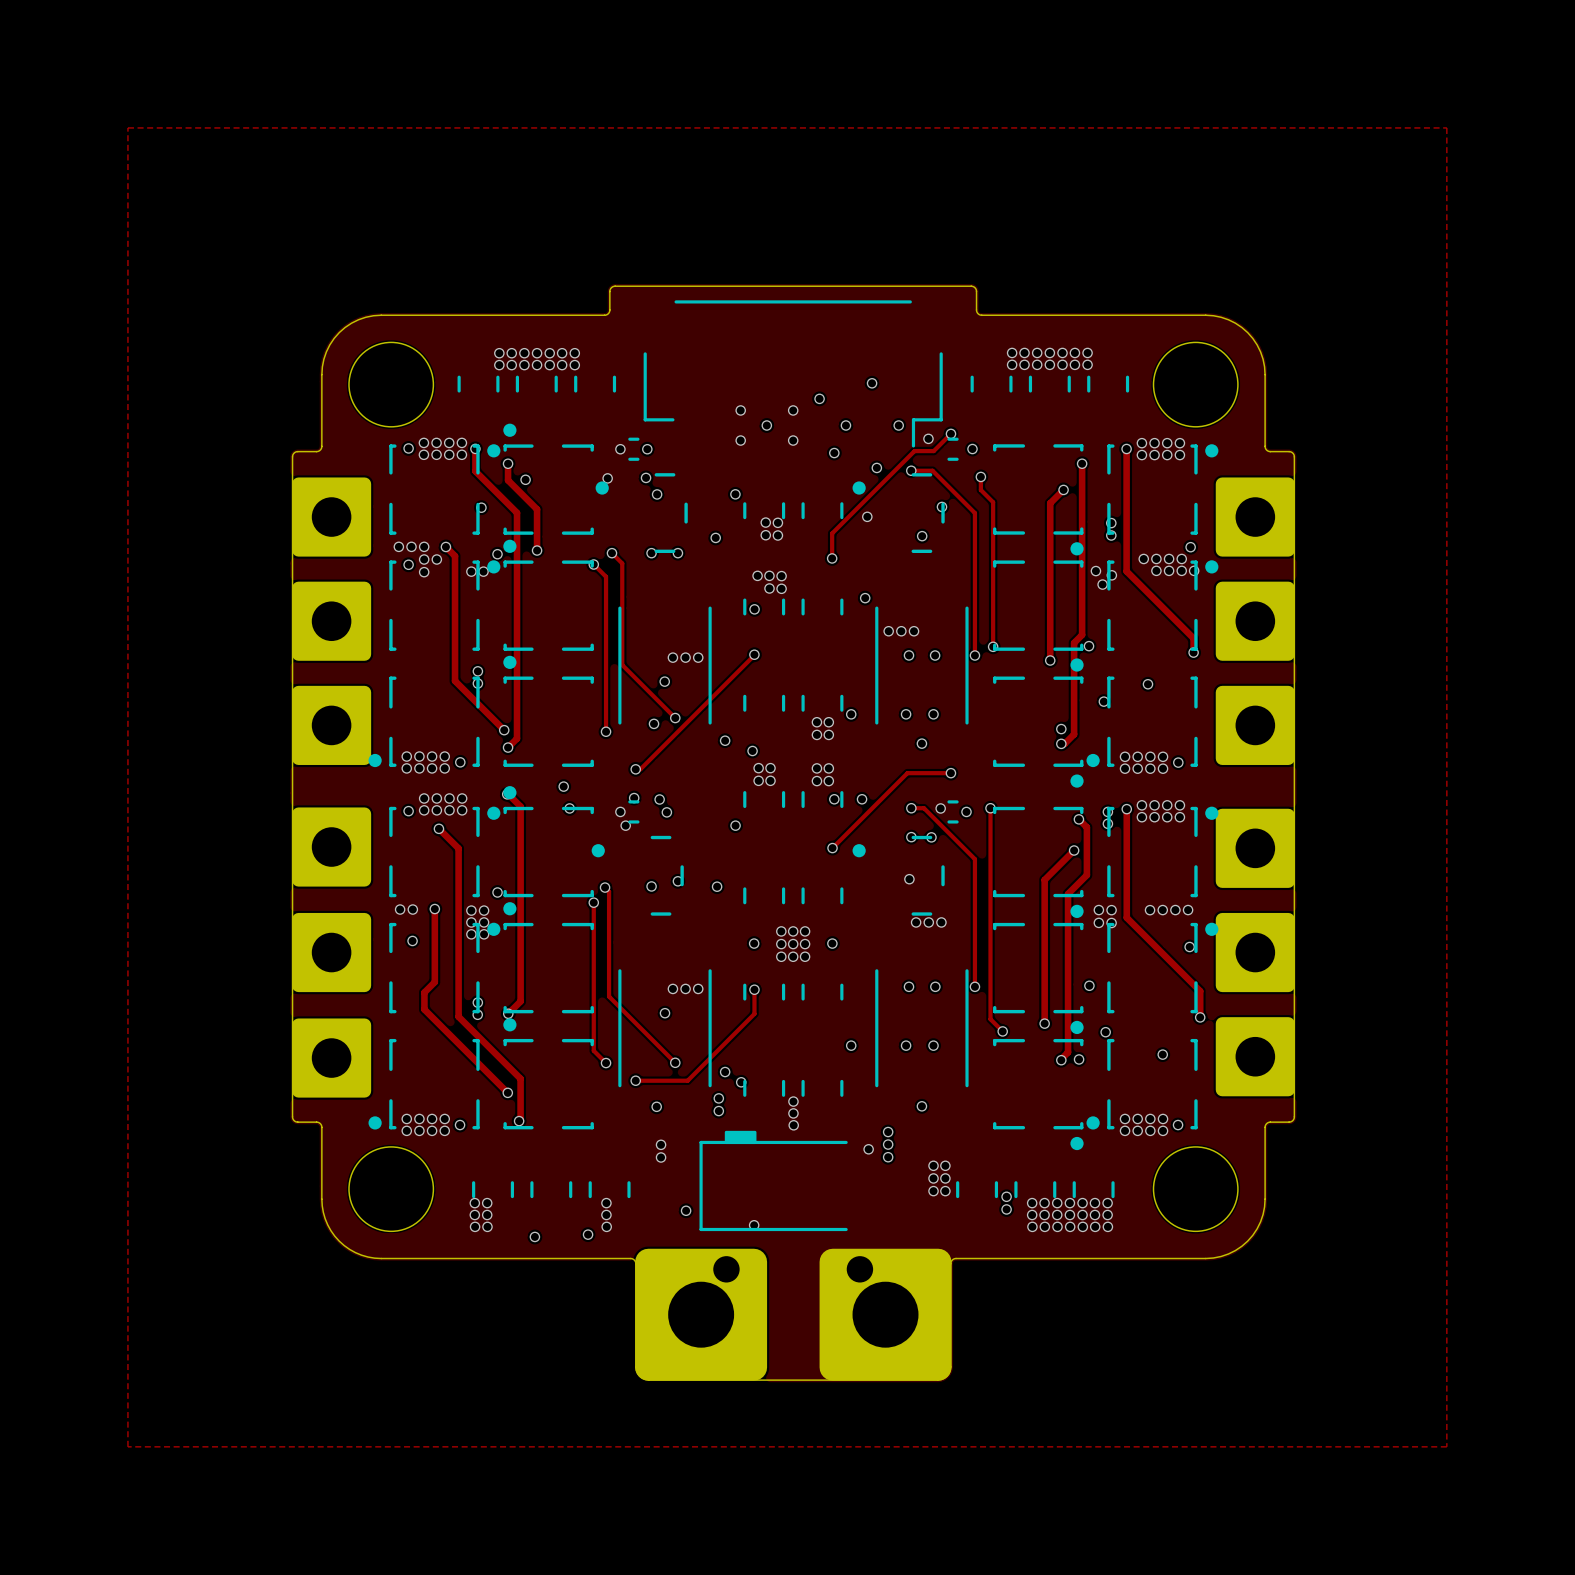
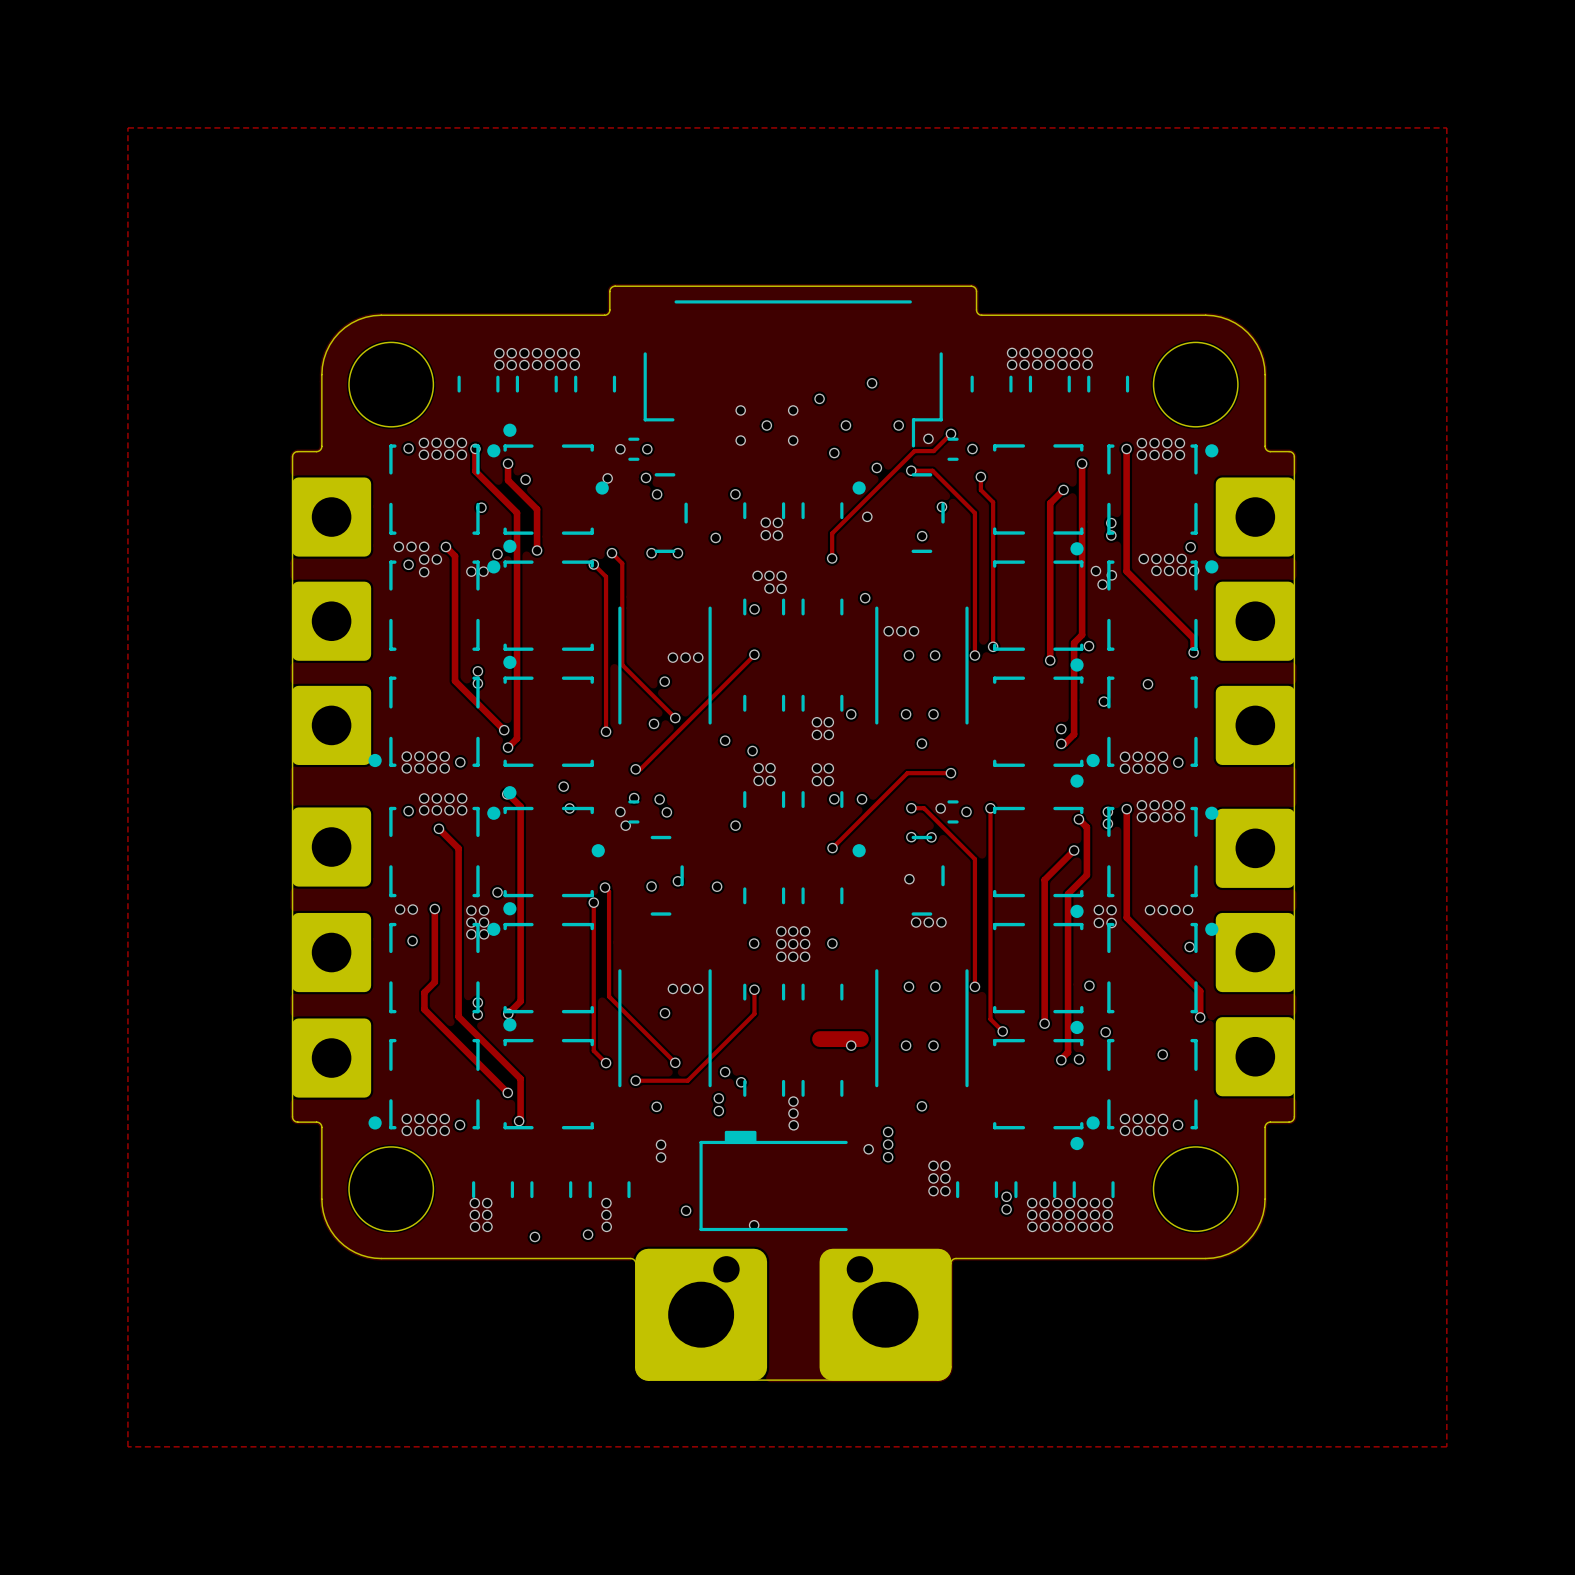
track: none -> (820, 1039) (860, 1039)

